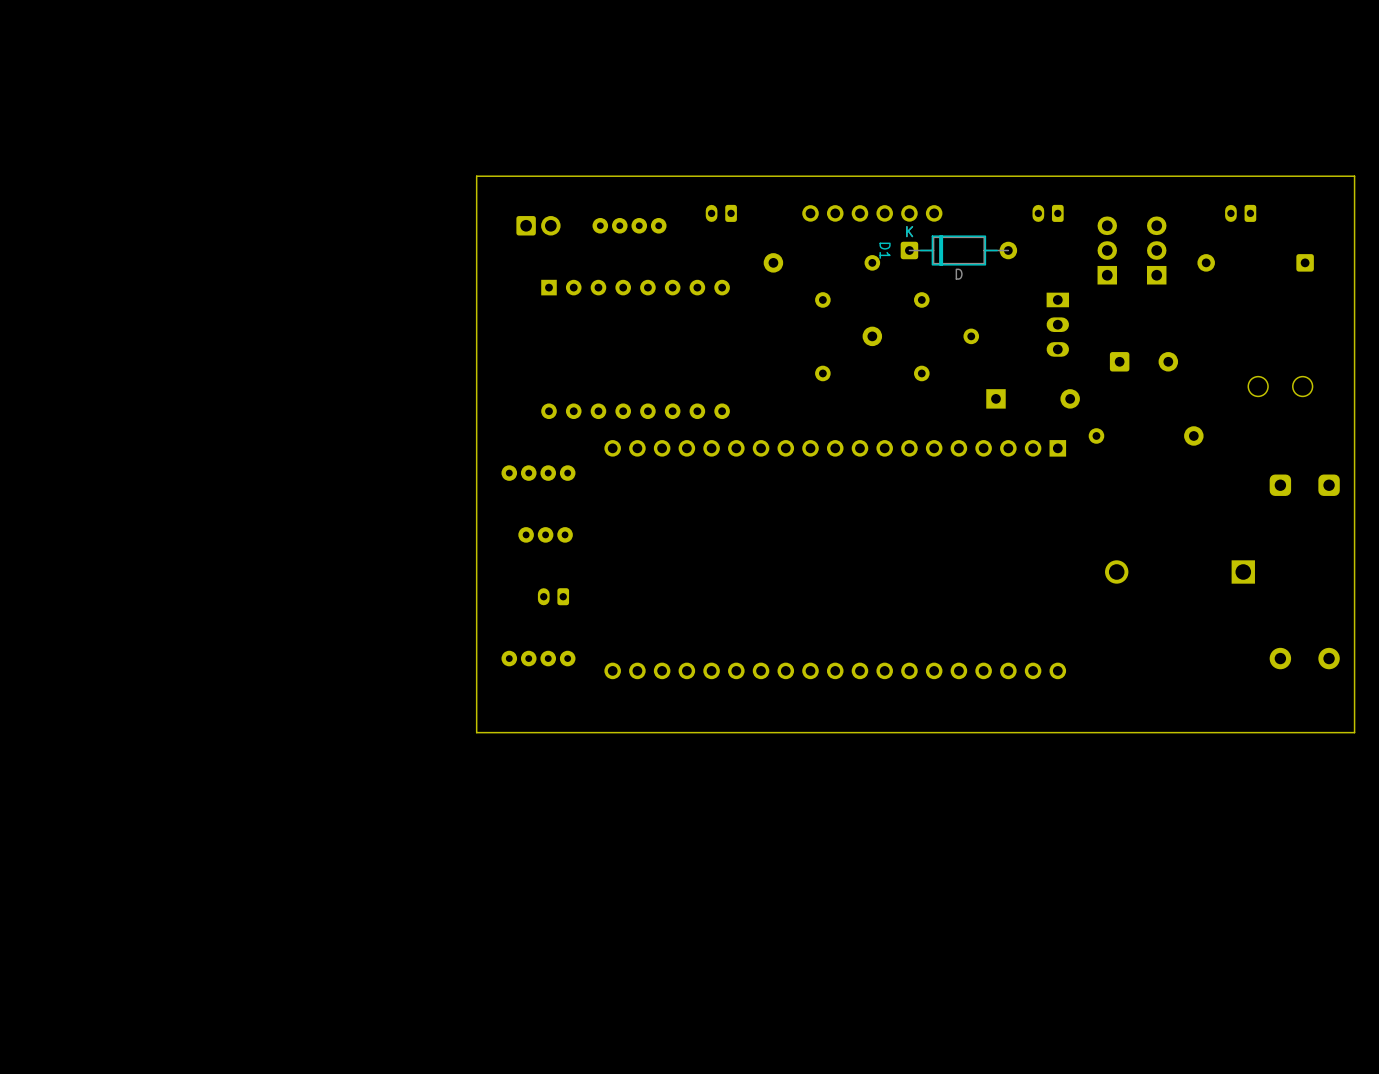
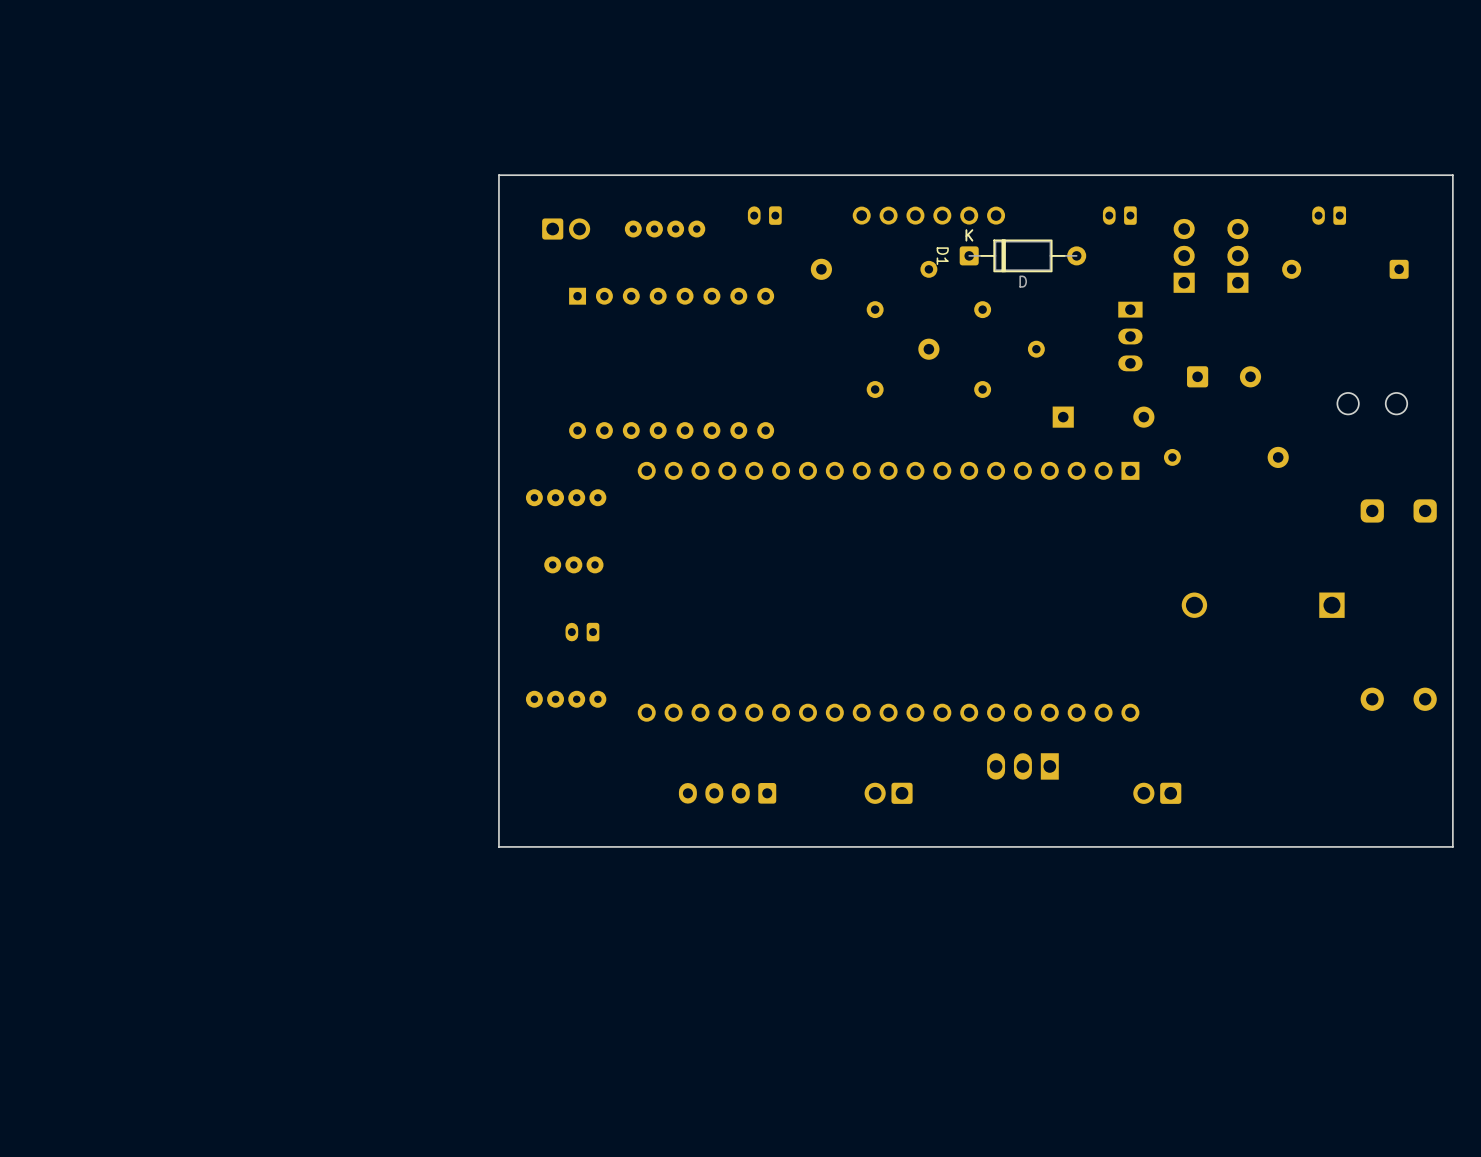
part: none -> (1022, 766)
board edge: (1354, 732) (476, 732) -> (1452, 779) (1452, 846) (498, 846) (498, 779)
part: none -> (727, 793)
part: none -> (888, 793)
part: none -> (1157, 793)

